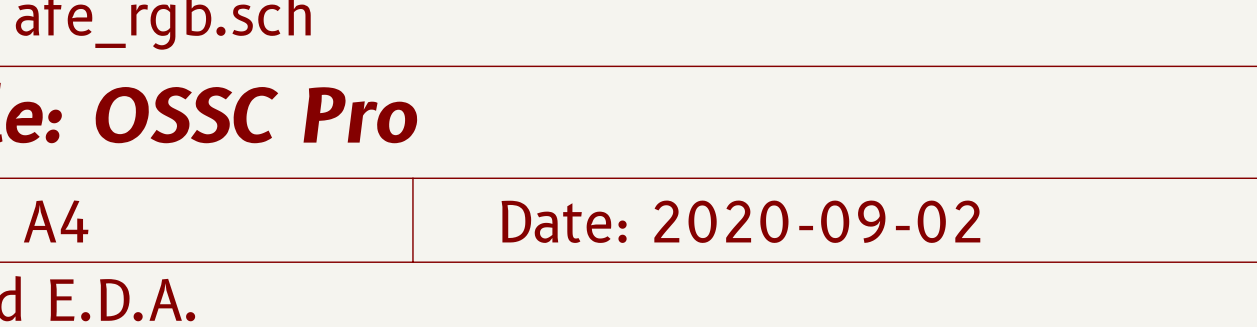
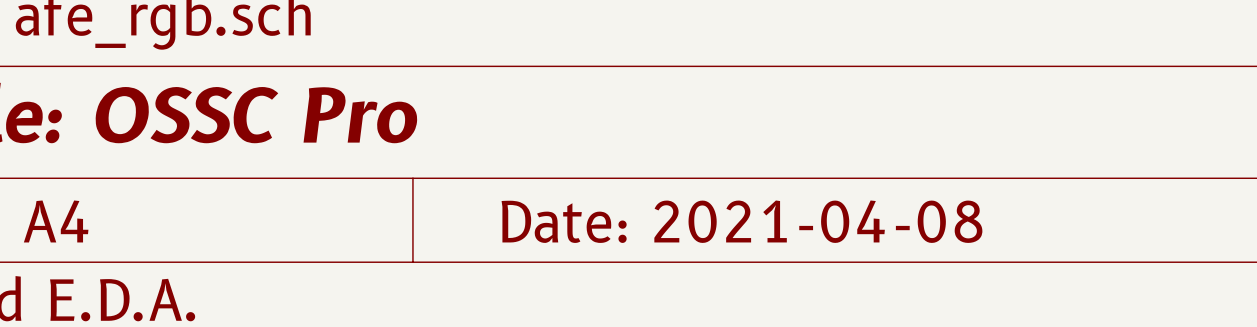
title block: Date: 2020-09-02 (740, 221) -> Date: 2021-04-08 (741, 221)

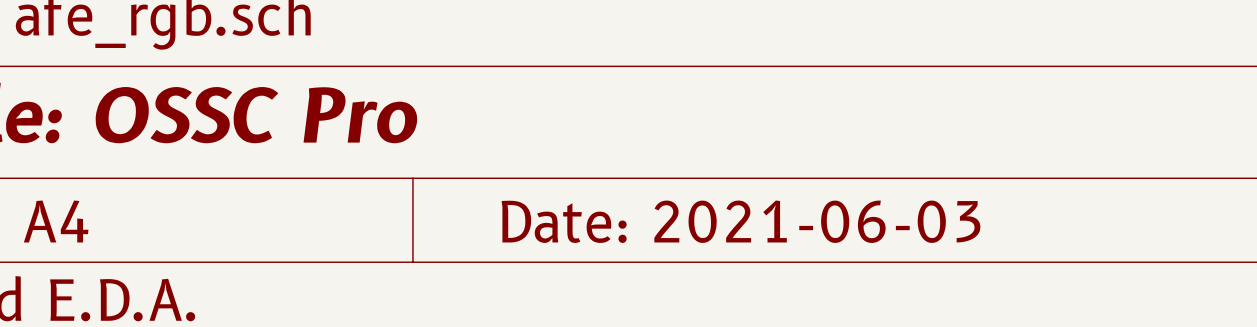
title block: Date: 2021-04-08 (741, 221) -> Date: 2021-06-03 (740, 221)

